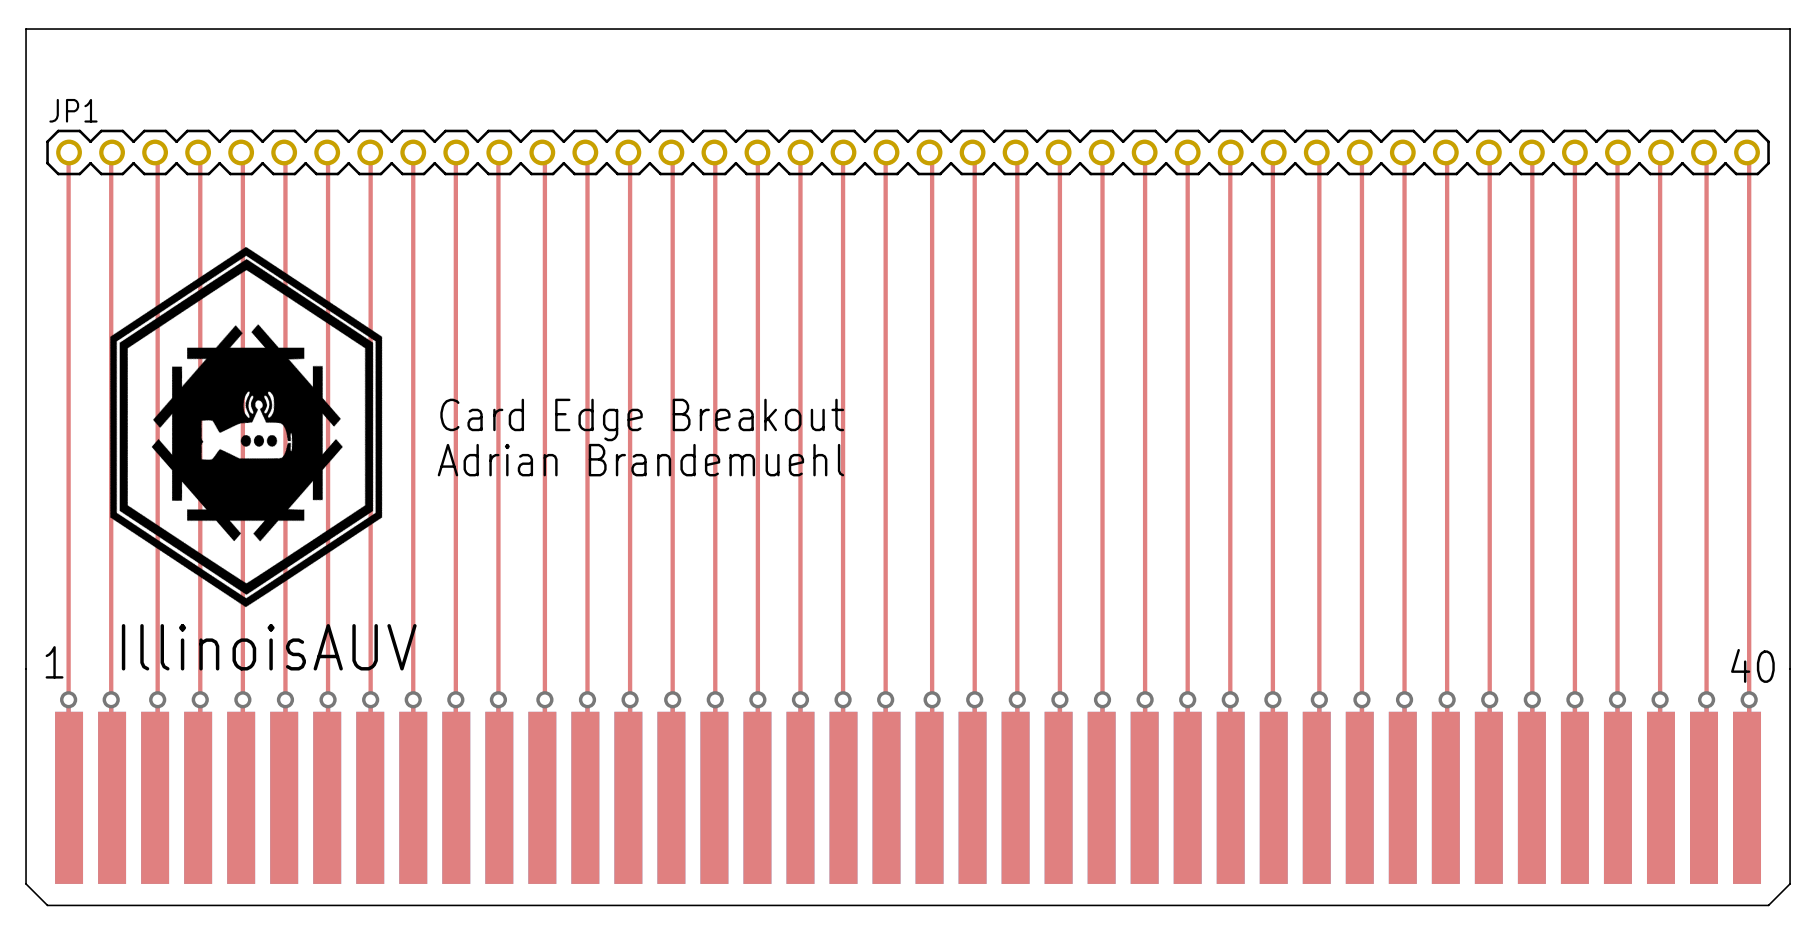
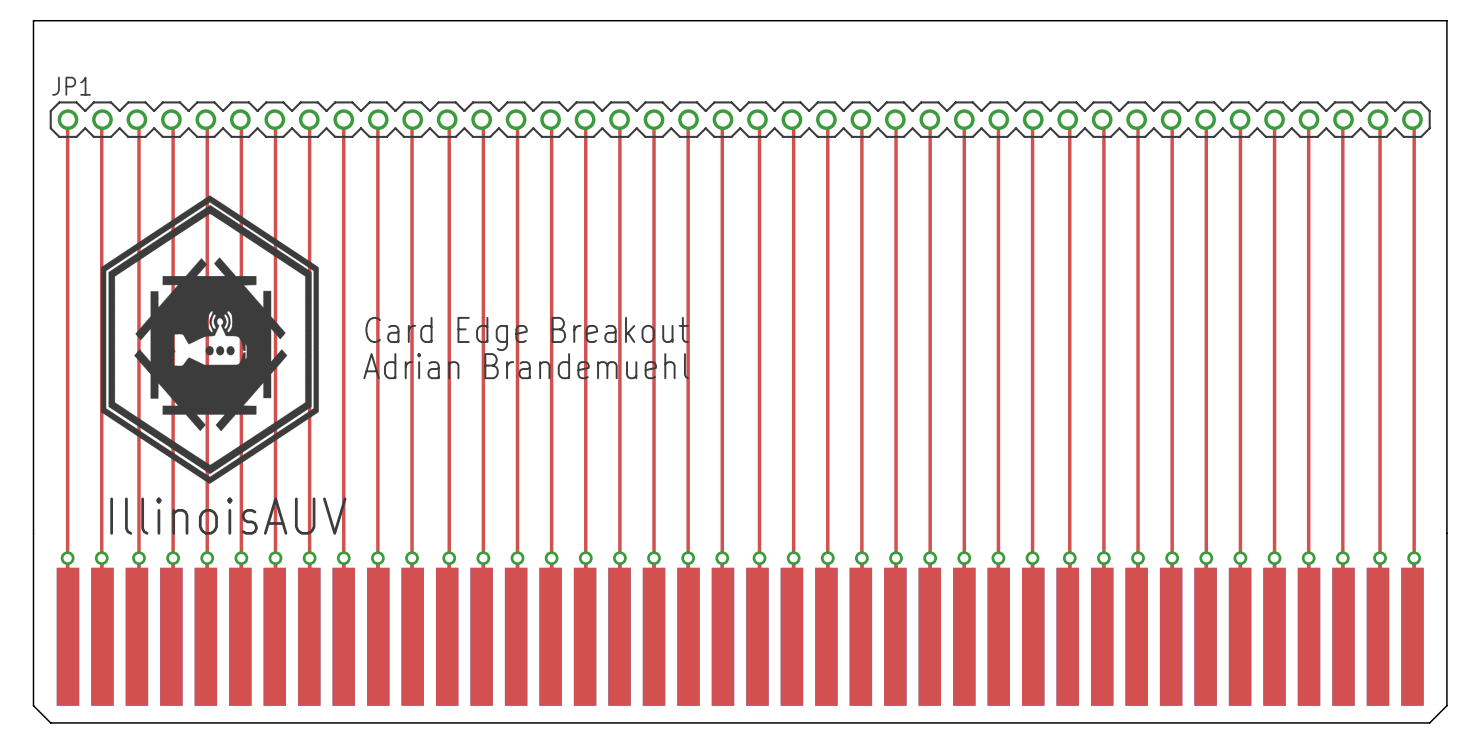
text: 1 (54, 662) -> none
text: 40 (1752, 665) -> none

